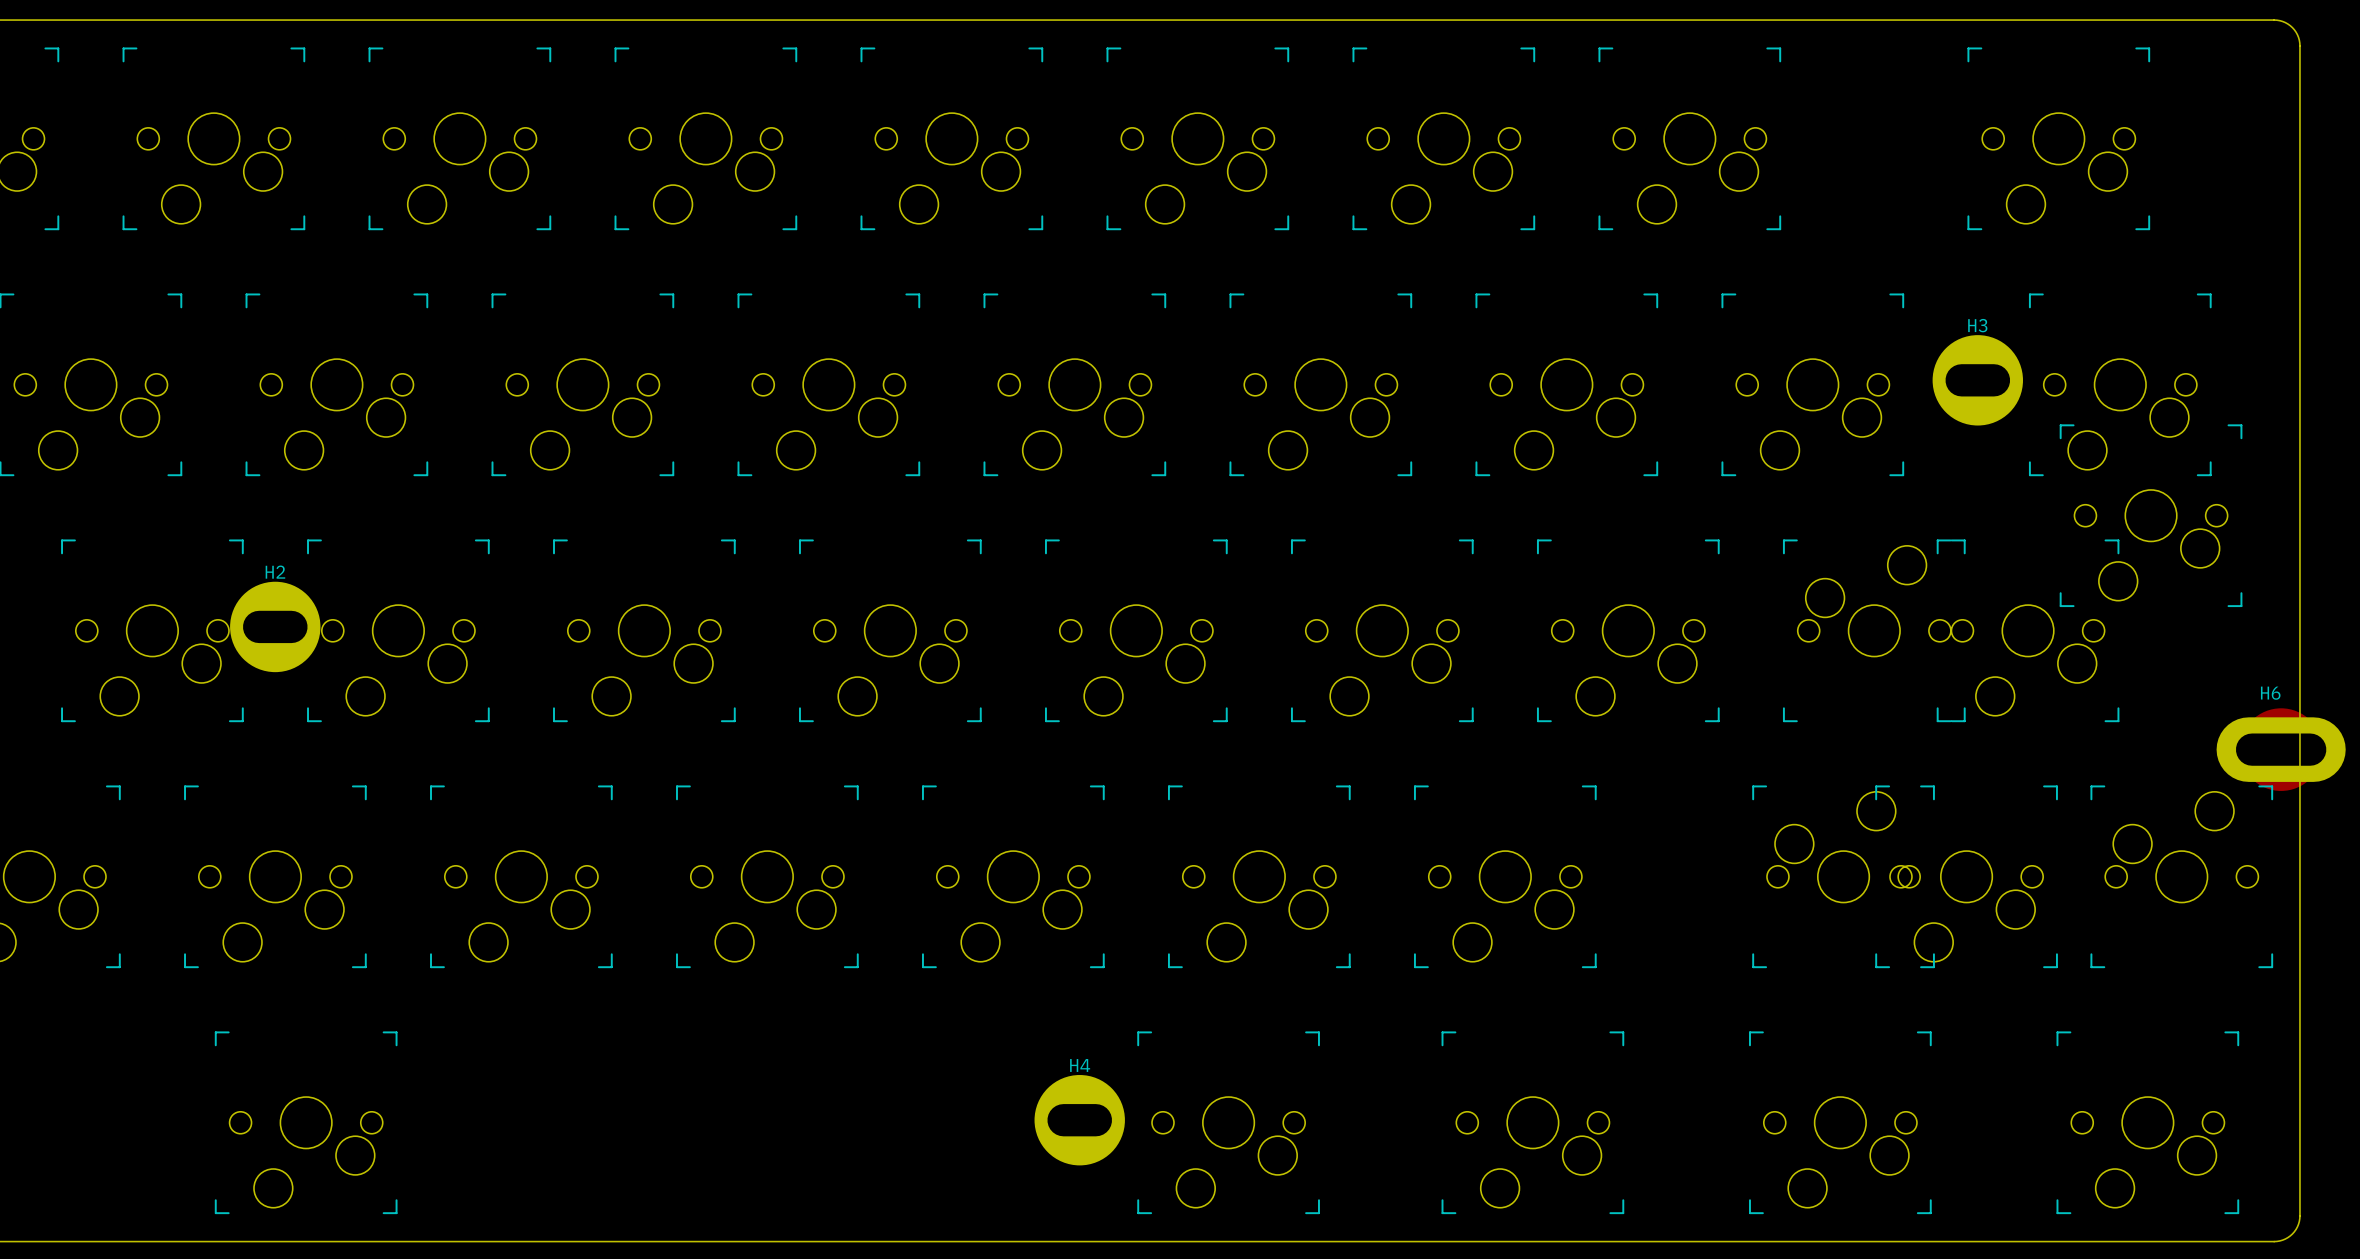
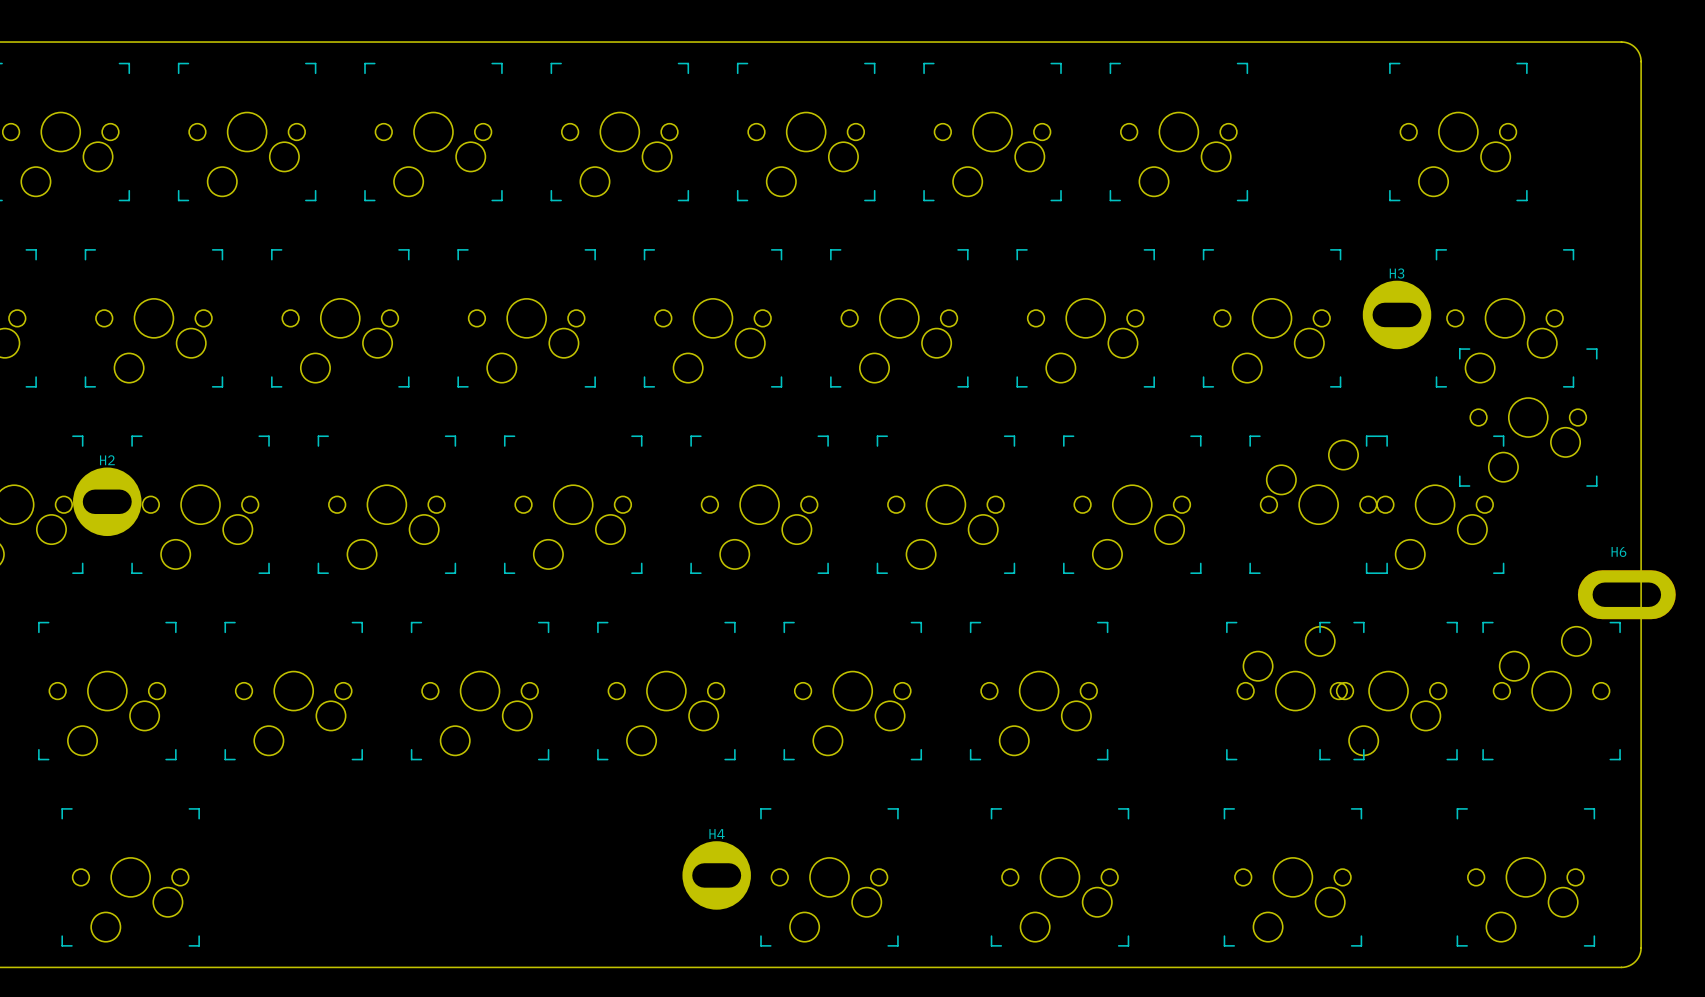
H6 footprint: [2216, 708, 2346, 791] -> [1577, 570, 1676, 620]

